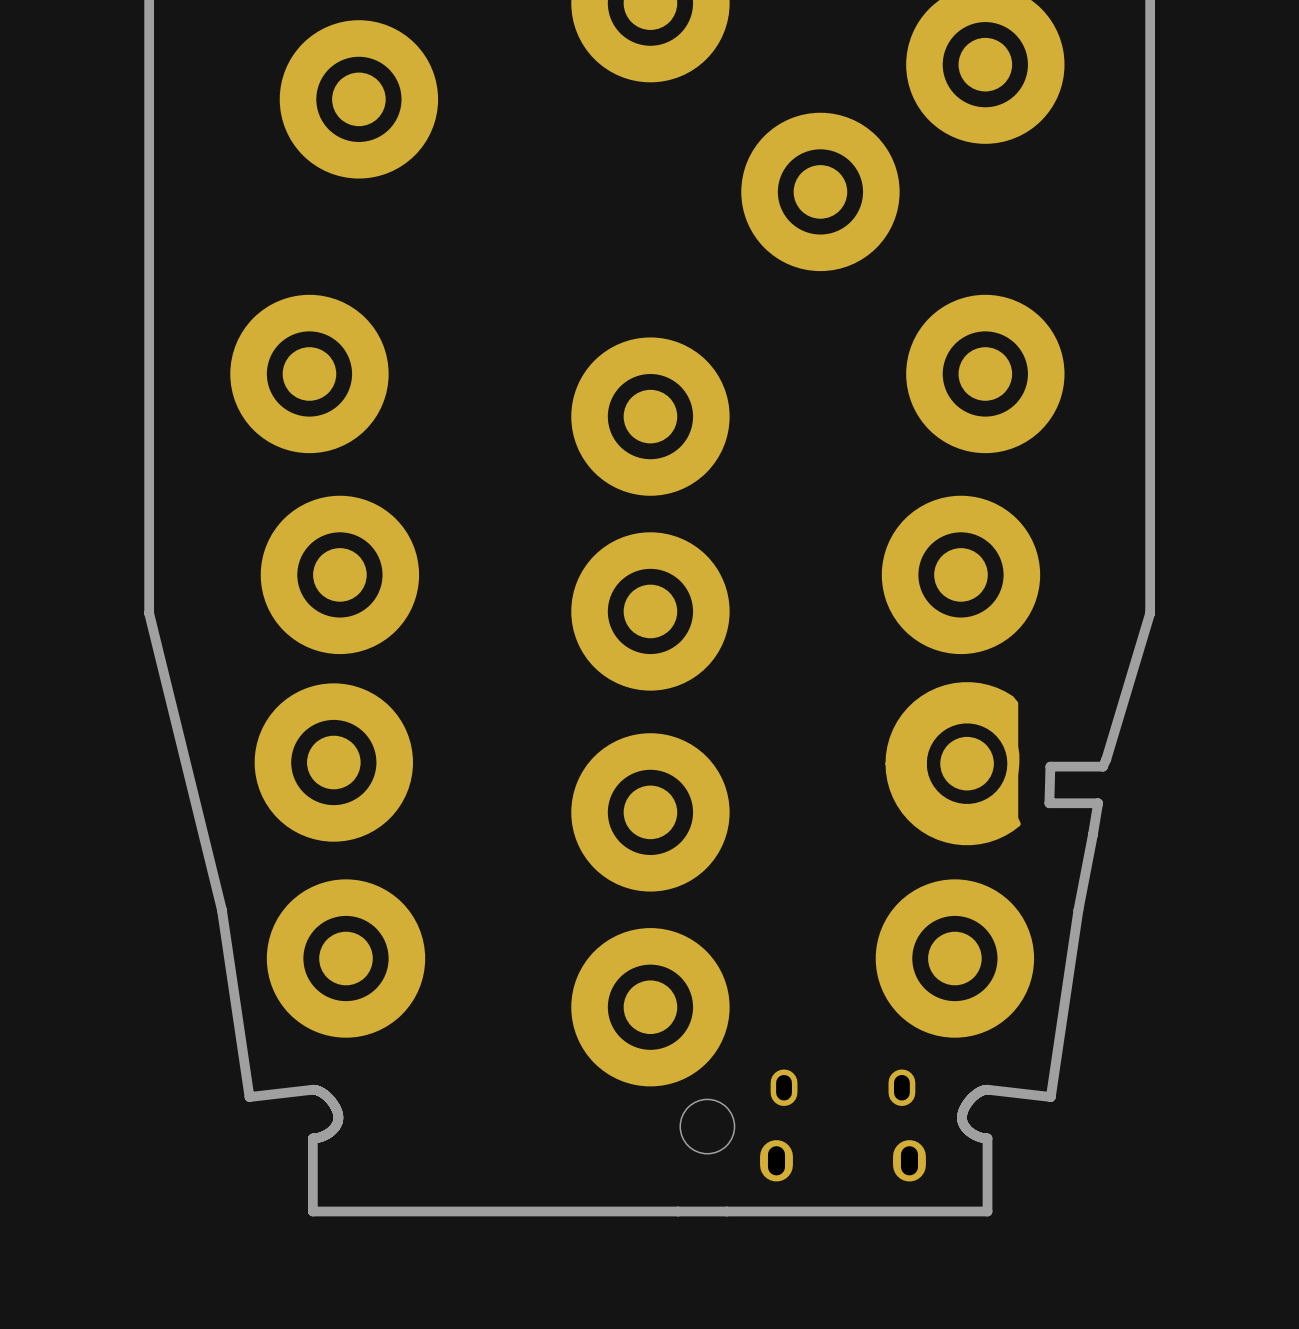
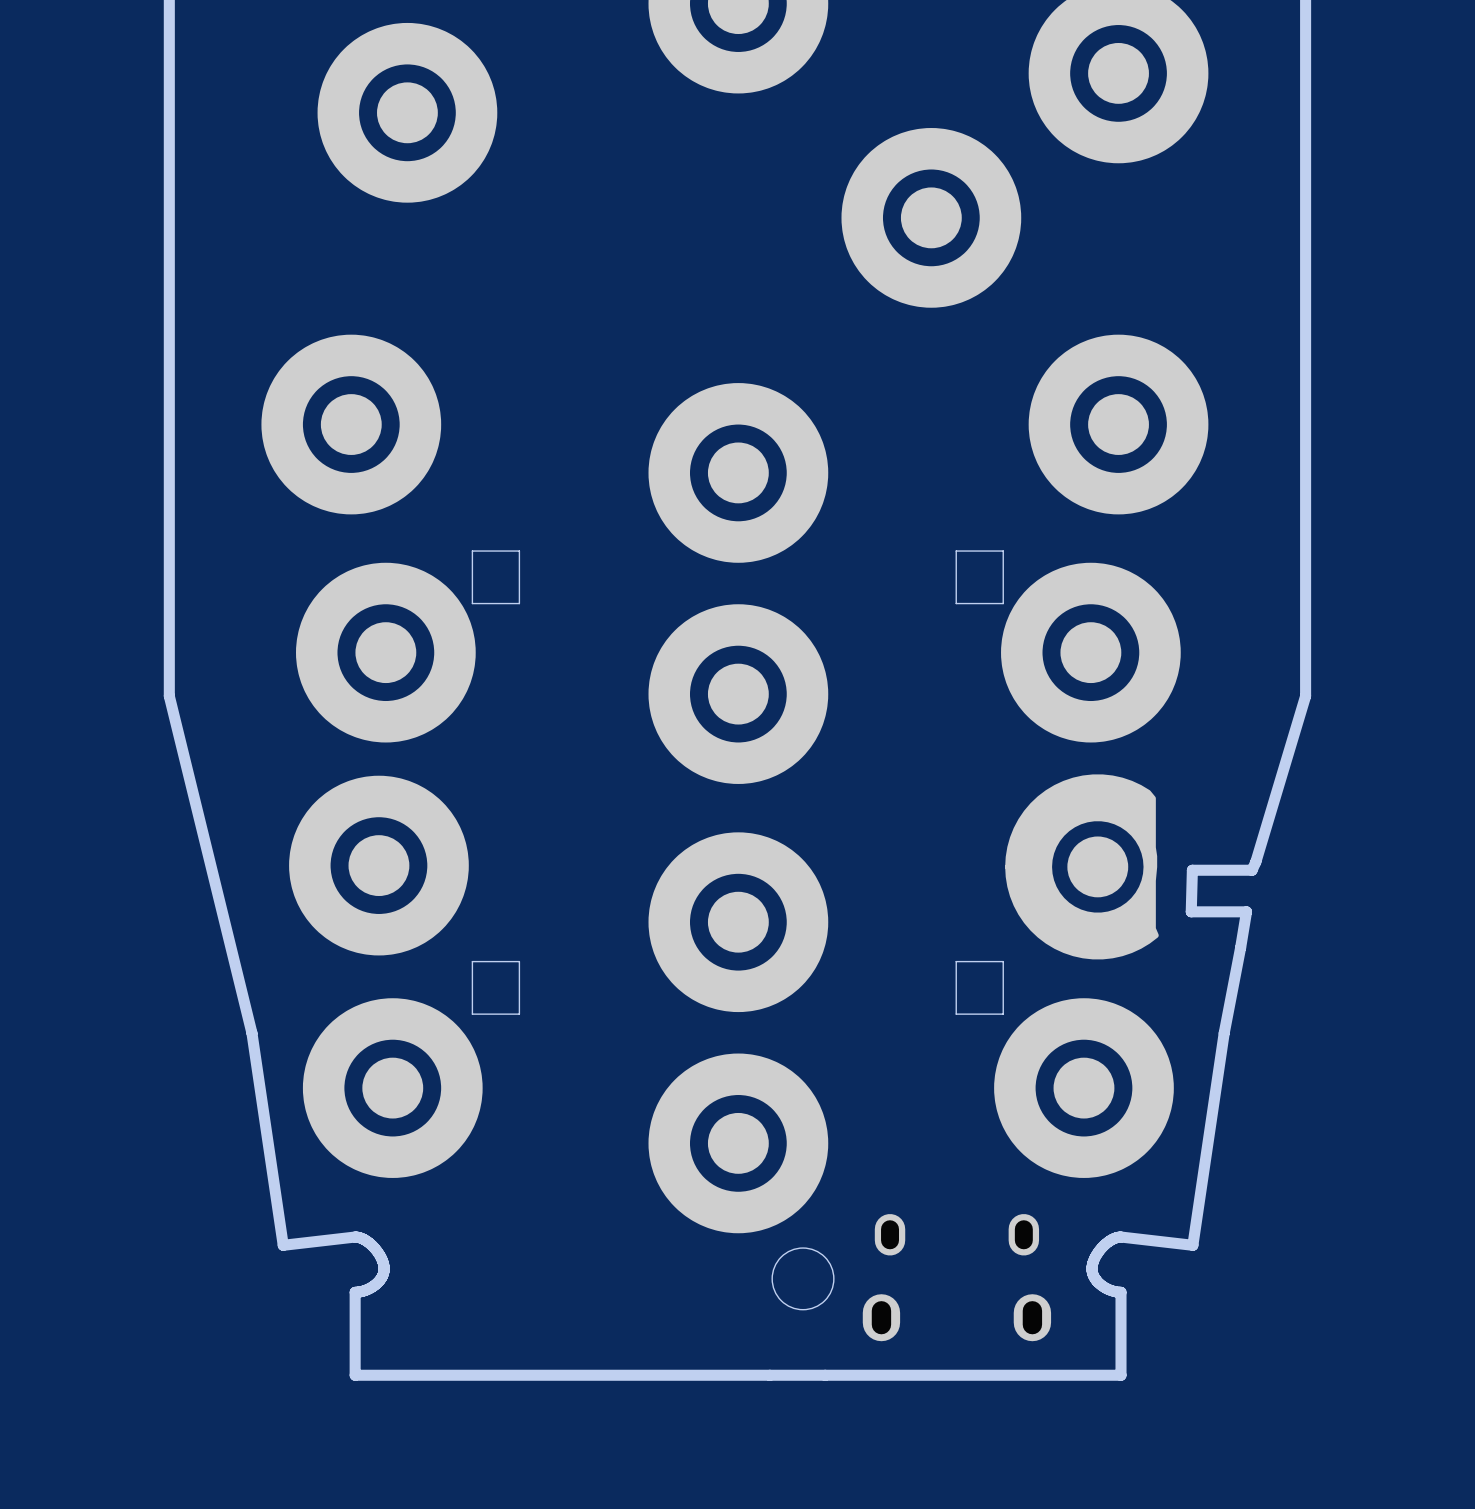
board edge: none -> (472, 551) (472, 603) (519, 603) (519, 551) (472, 551)
board edge: none -> (956, 551) (1003, 551) (1003, 603) (956, 603) (956, 551)
board edge: none -> (472, 961) (519, 961) (519, 1014) (472, 1014) (472, 961)
board edge: none -> (956, 961) (1003, 961) (1003, 1014) (956, 1014) (956, 961)

